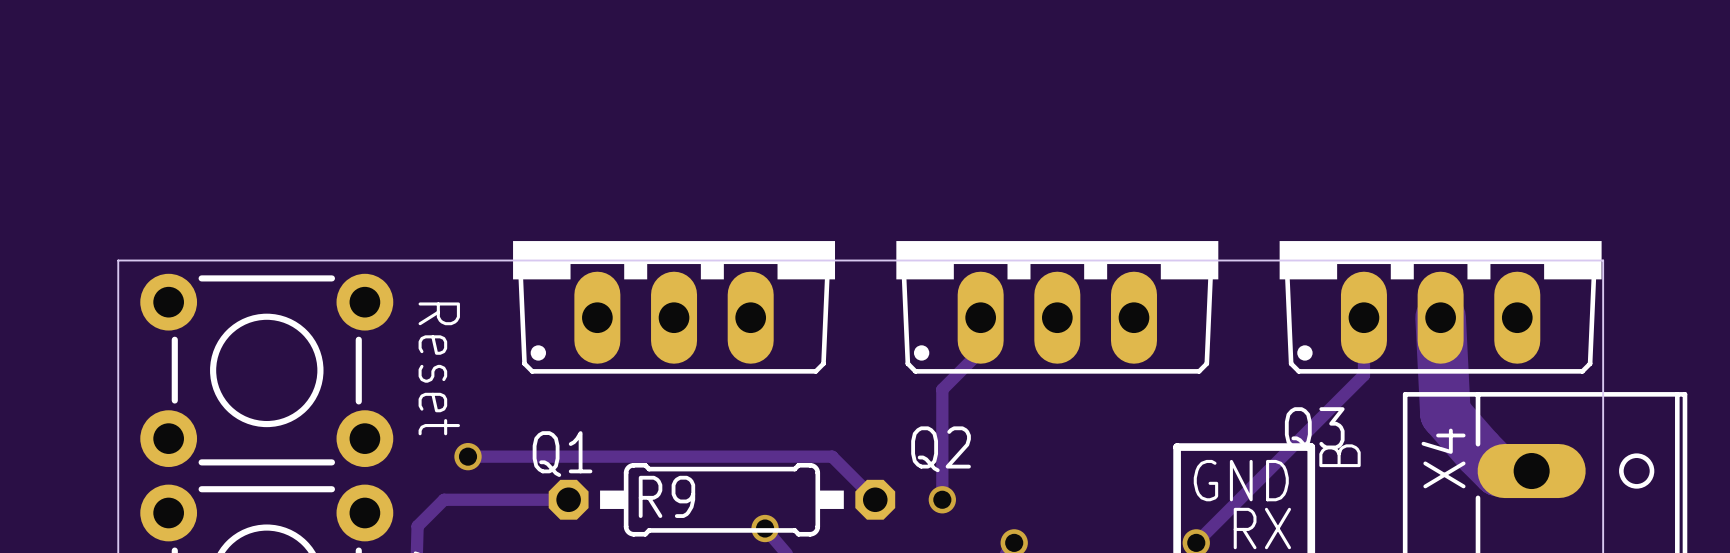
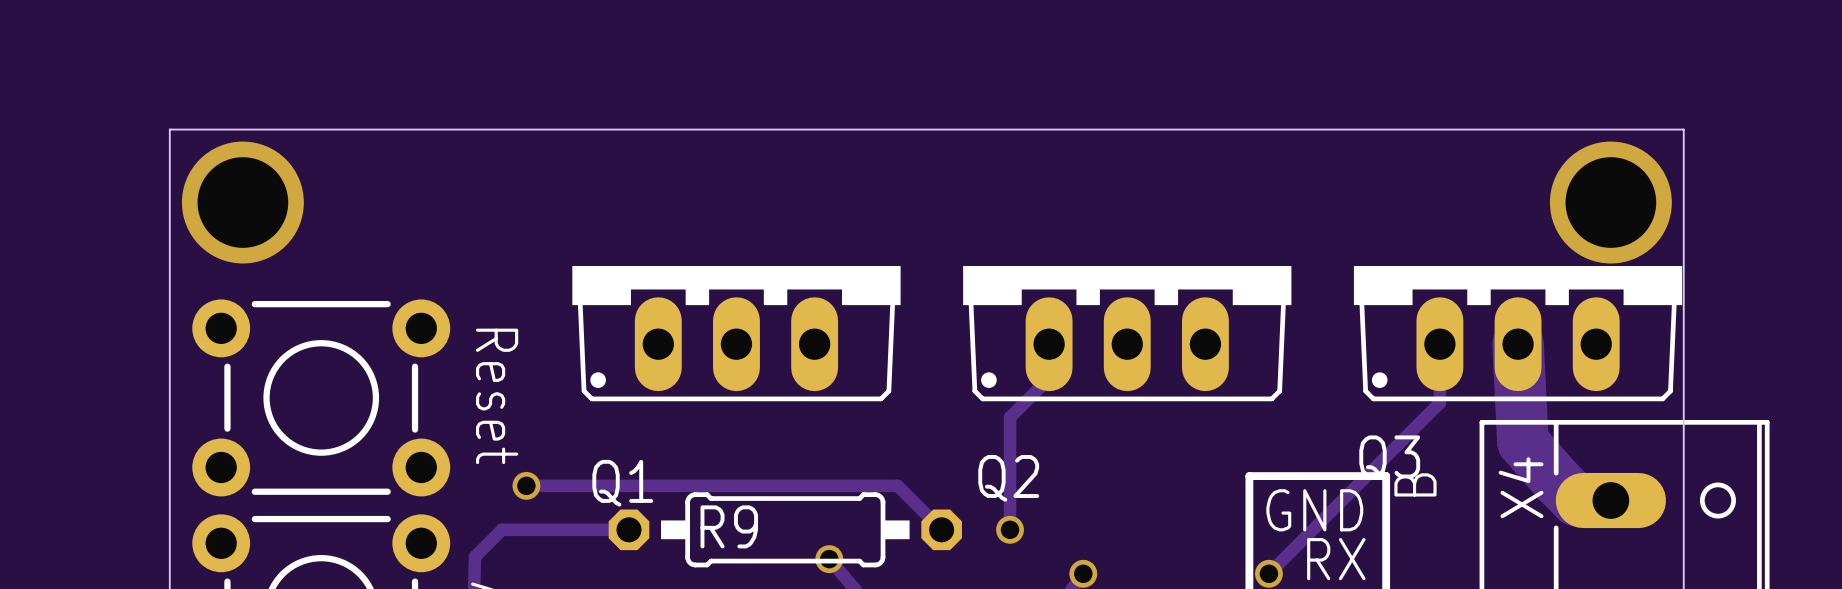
via: none -> (242, 202)
via: none -> (1610, 202)
board edge: (118, 260) (1603, 260) -> (169, 285) (169, 129) (1683, 129) (1683, 285)

